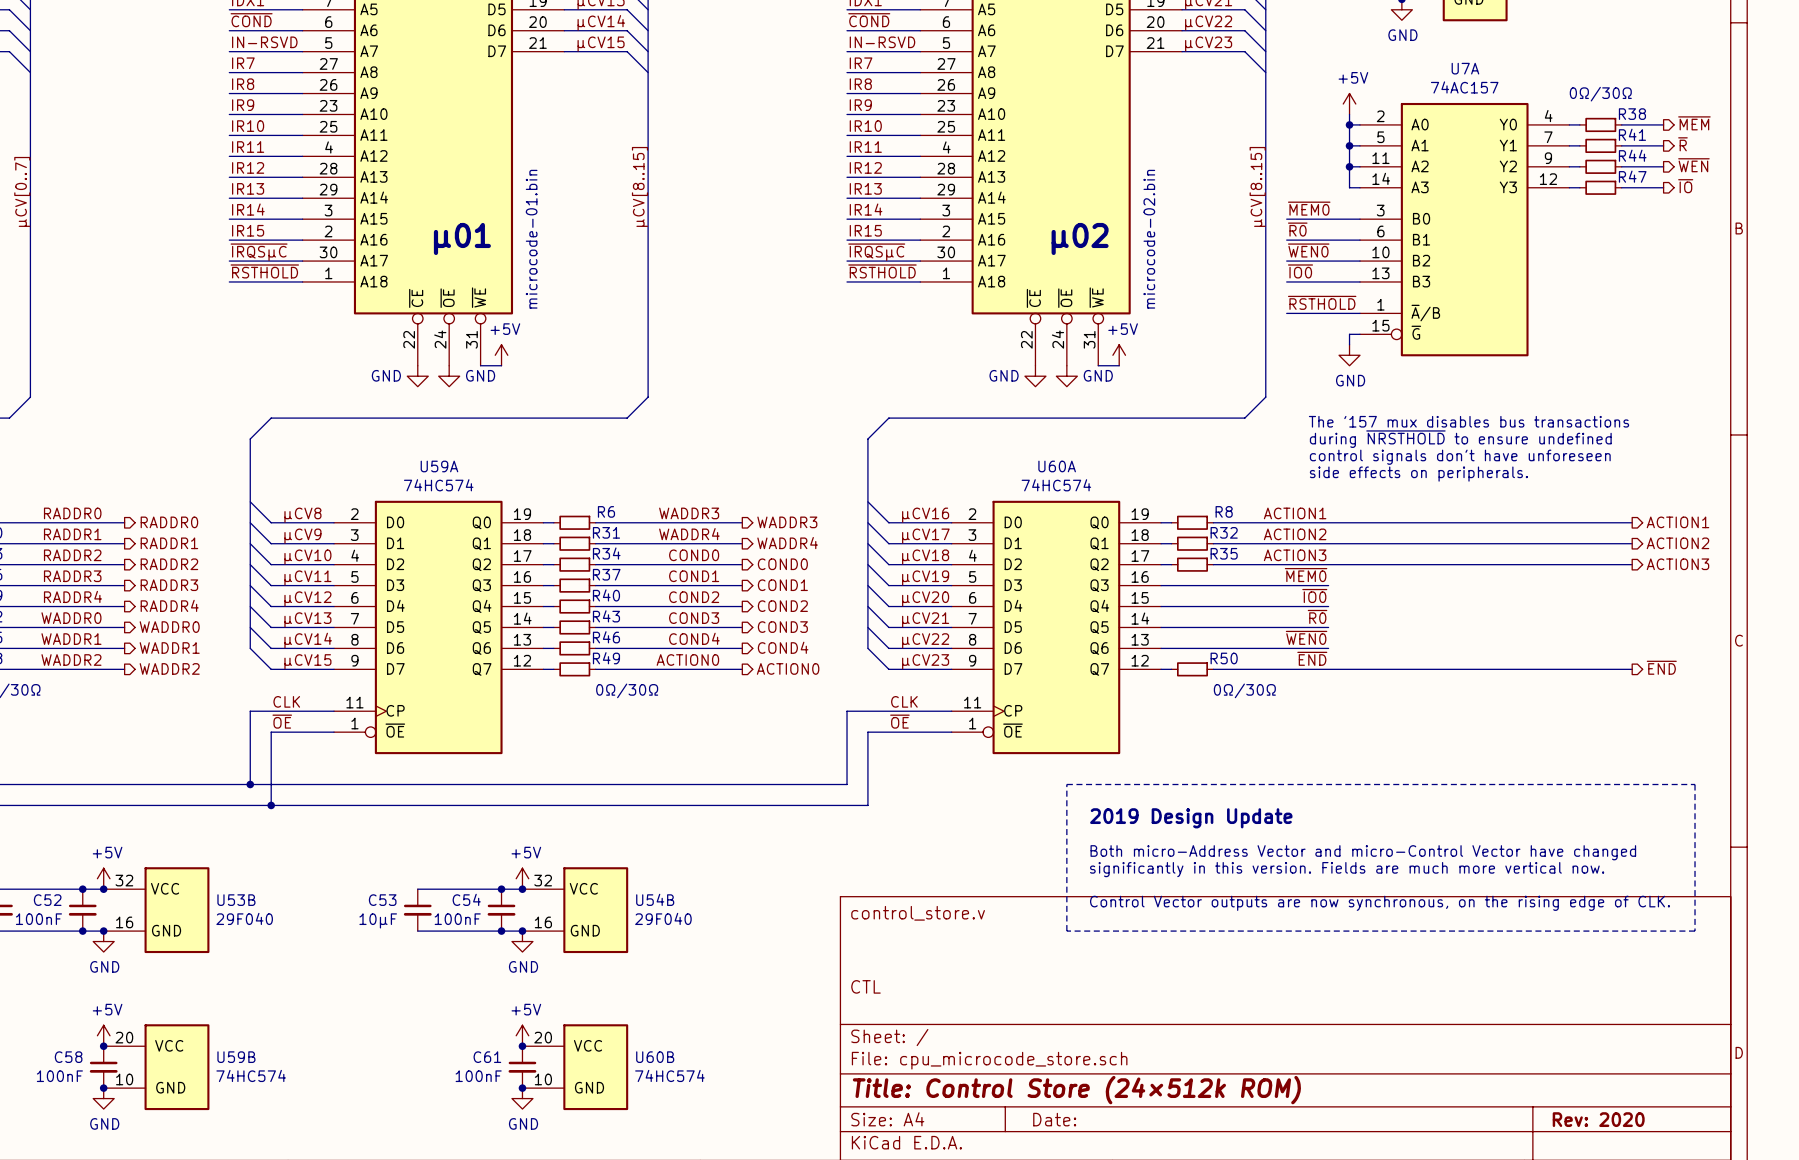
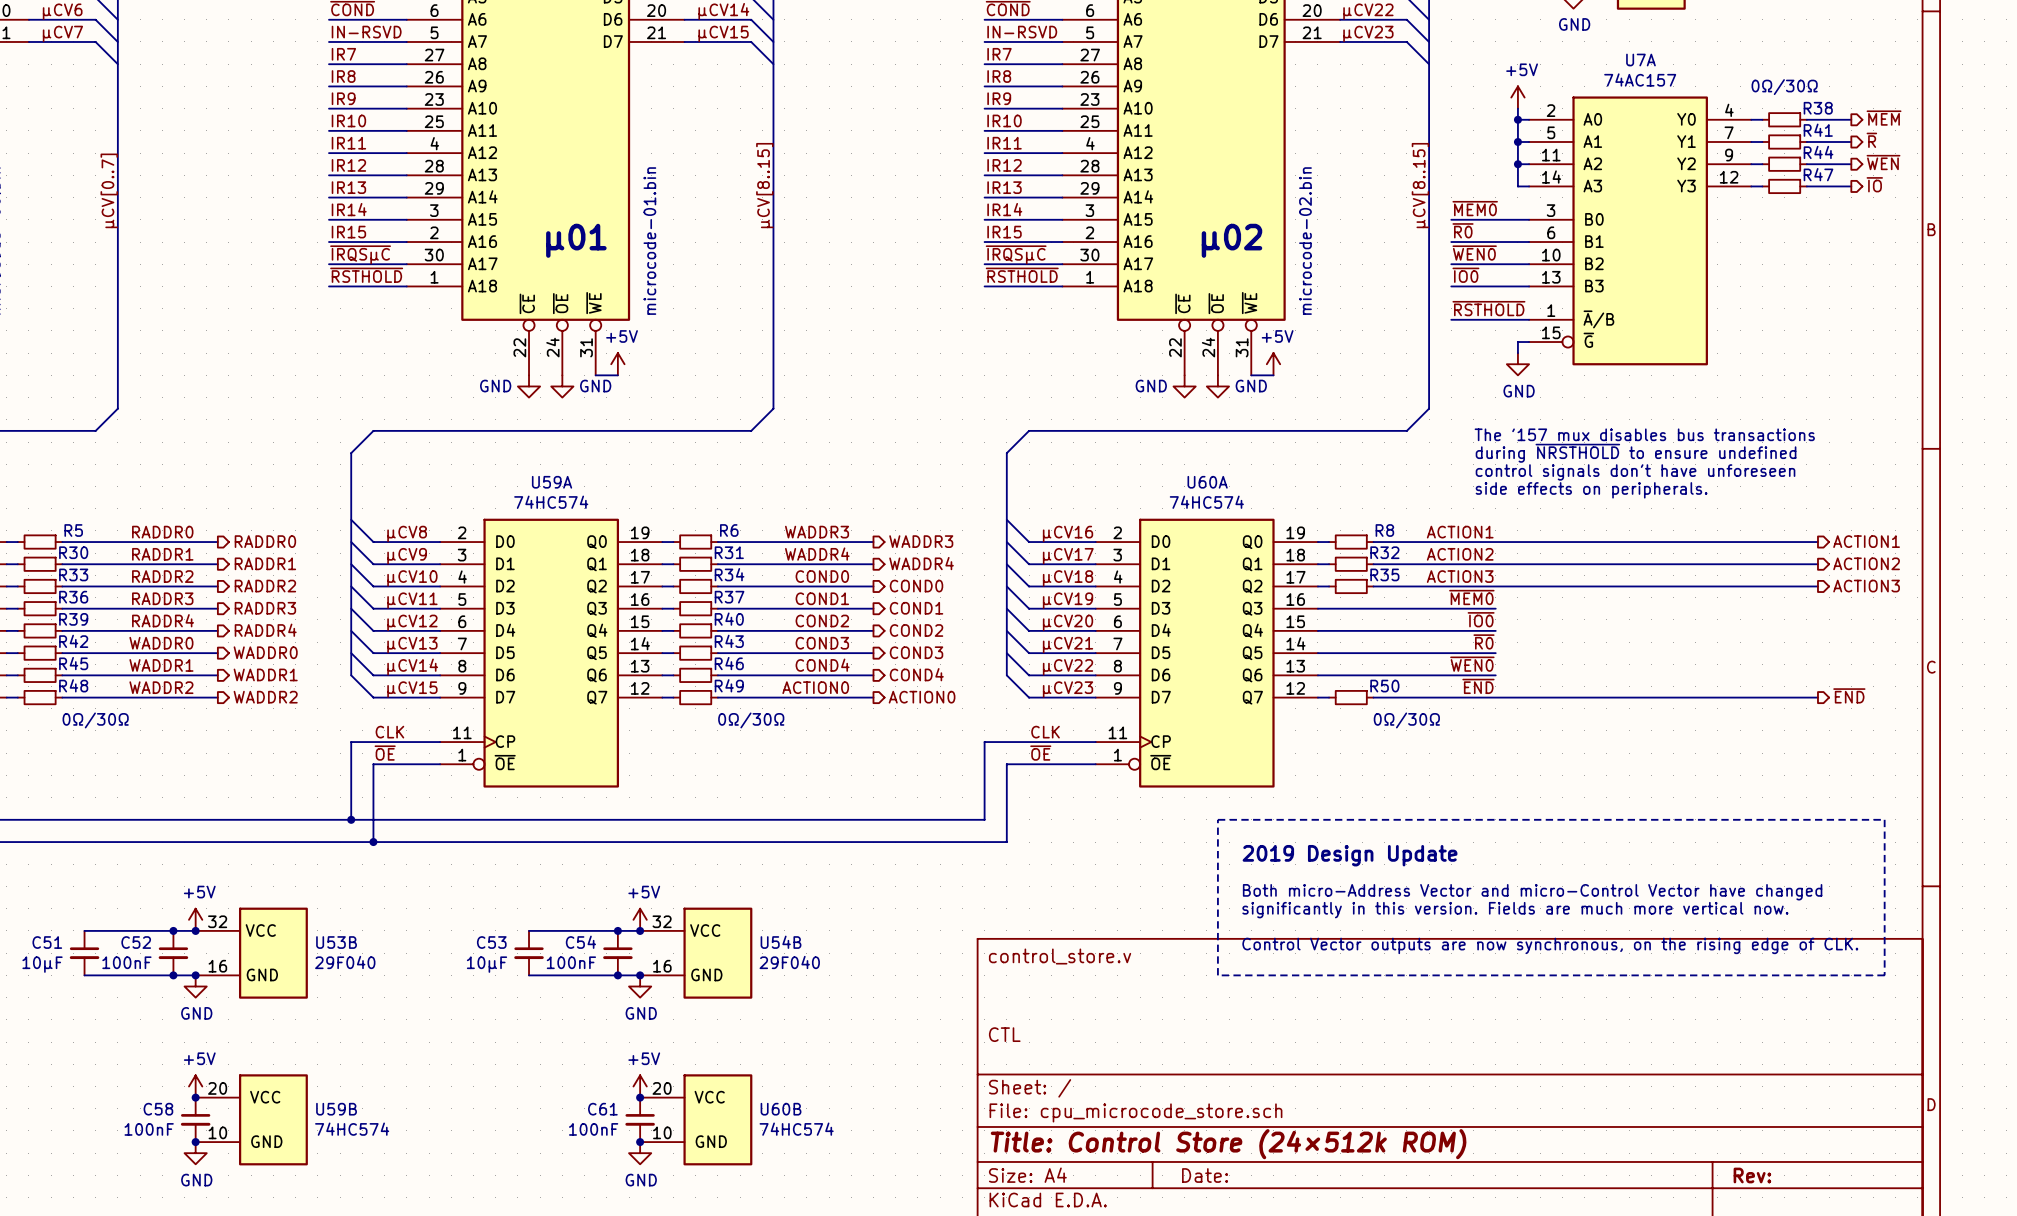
title block: Rev: 2020 (1598, 1119) -> Rev: (1752, 1175)

